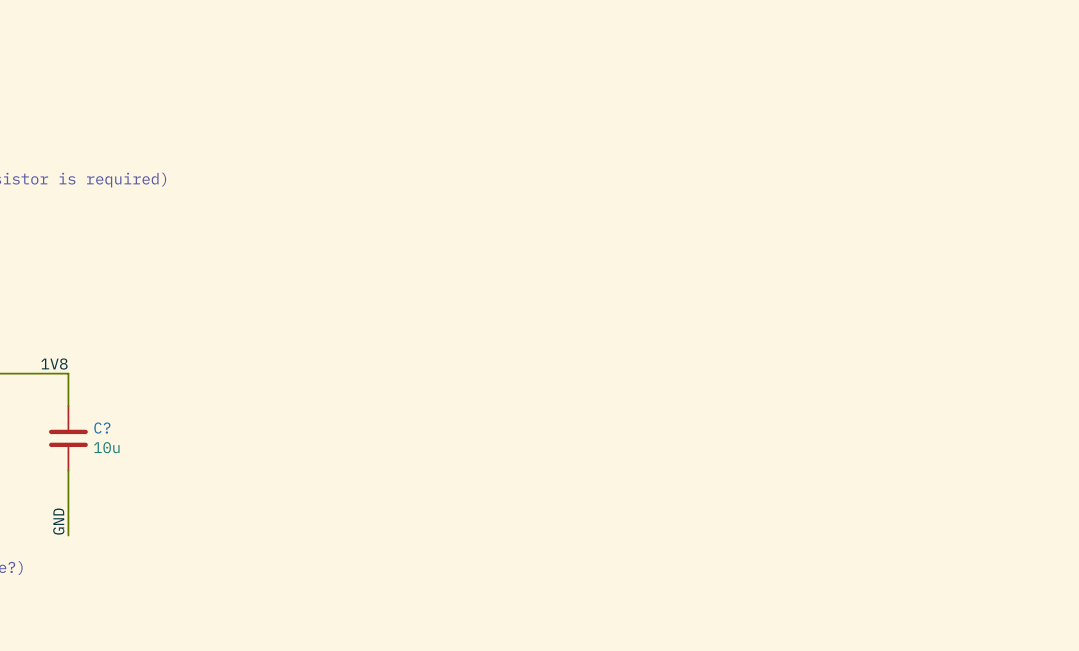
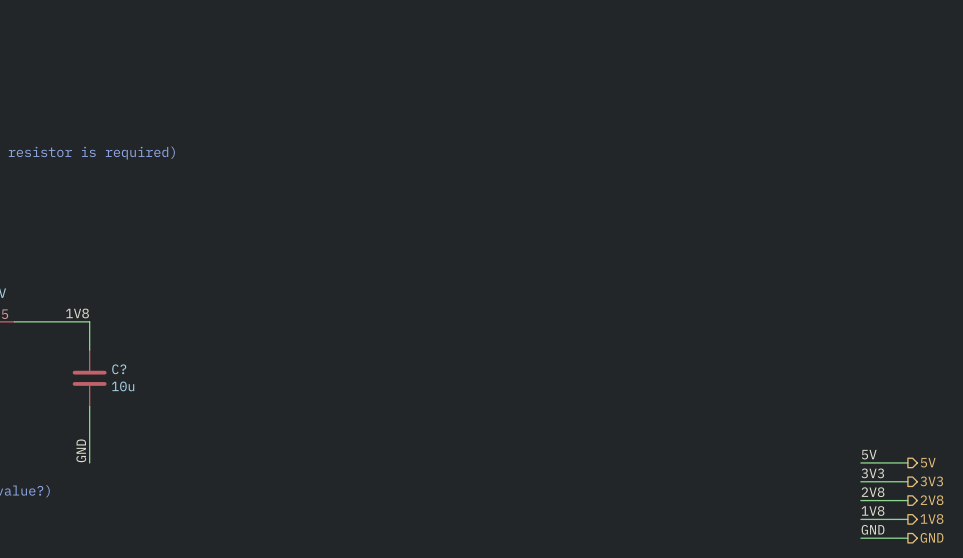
label: none -> 5V (869, 454)
wire: none -> (860, 462) (907, 462)
hierarchical label: none -> 5V (928, 462)
label: none -> 3V3 (872, 473)
hierarchical label: none -> 3V3 (931, 481)
wire: none -> (860, 481) (907, 481)
label: none -> 2V8 (873, 492)
wire: none -> (860, 500) (907, 500)
hierarchical label: none -> 2V8 (932, 500)
label: none -> 1V8 (873, 511)
hierarchical label: none -> 1V8 (931, 519)
wire: none -> (860, 519) (907, 519)
label: none -> GND (873, 529)
wire: none -> (860, 538) (907, 538)
hierarchical label: none -> GND (932, 537)

